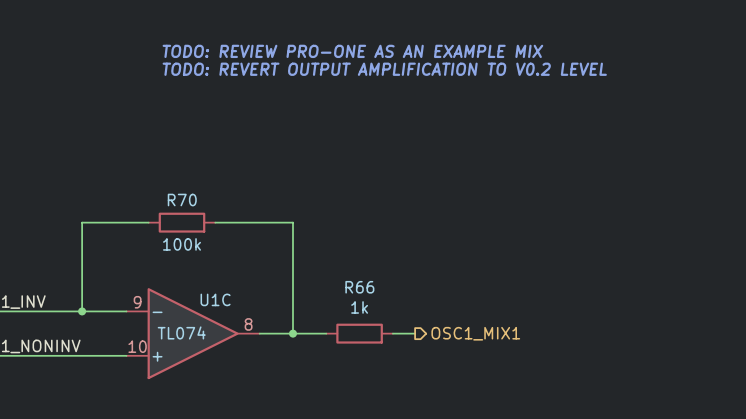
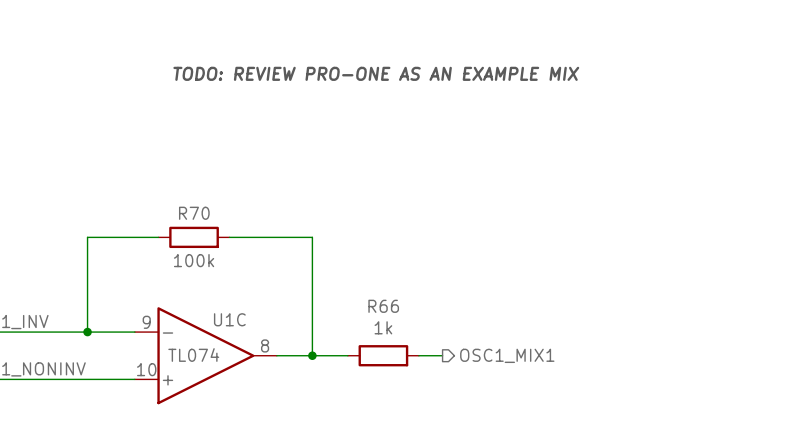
text: TODO: REVIEW PRO-ONE AS AN EXAMPLE MIX (352, 51) -> none
text: TODO: REVERT OUTPUT AMPLIFICATION TO V0.2 LEVEL (384, 69) -> TODO: REVIEW PRO-ONE AS AN EXAMPLE MIX (376, 73)

